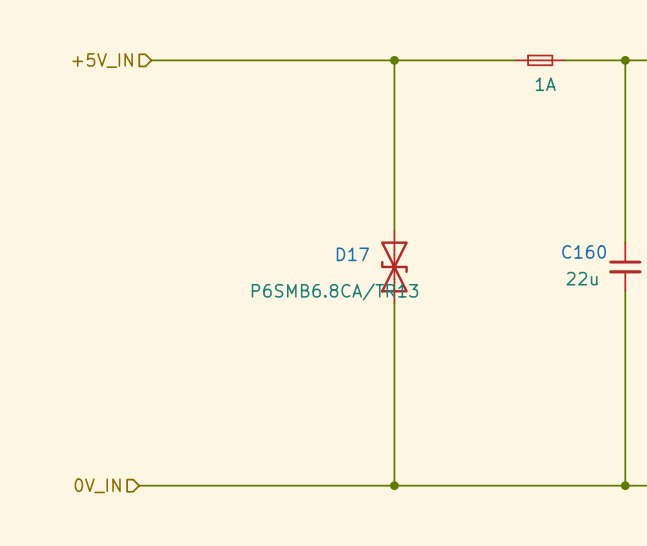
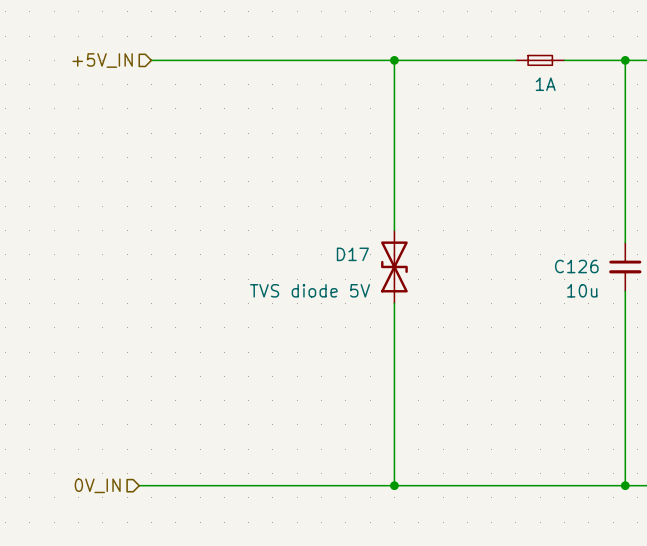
C160 name: C160 (584, 251) -> C126 (576, 266)
C160 value: 22u (581, 278) -> 10u (582, 290)
D17 value: P6SMB6.8CA/TR13 (334, 291) -> TVS diode 5V (310, 290)

